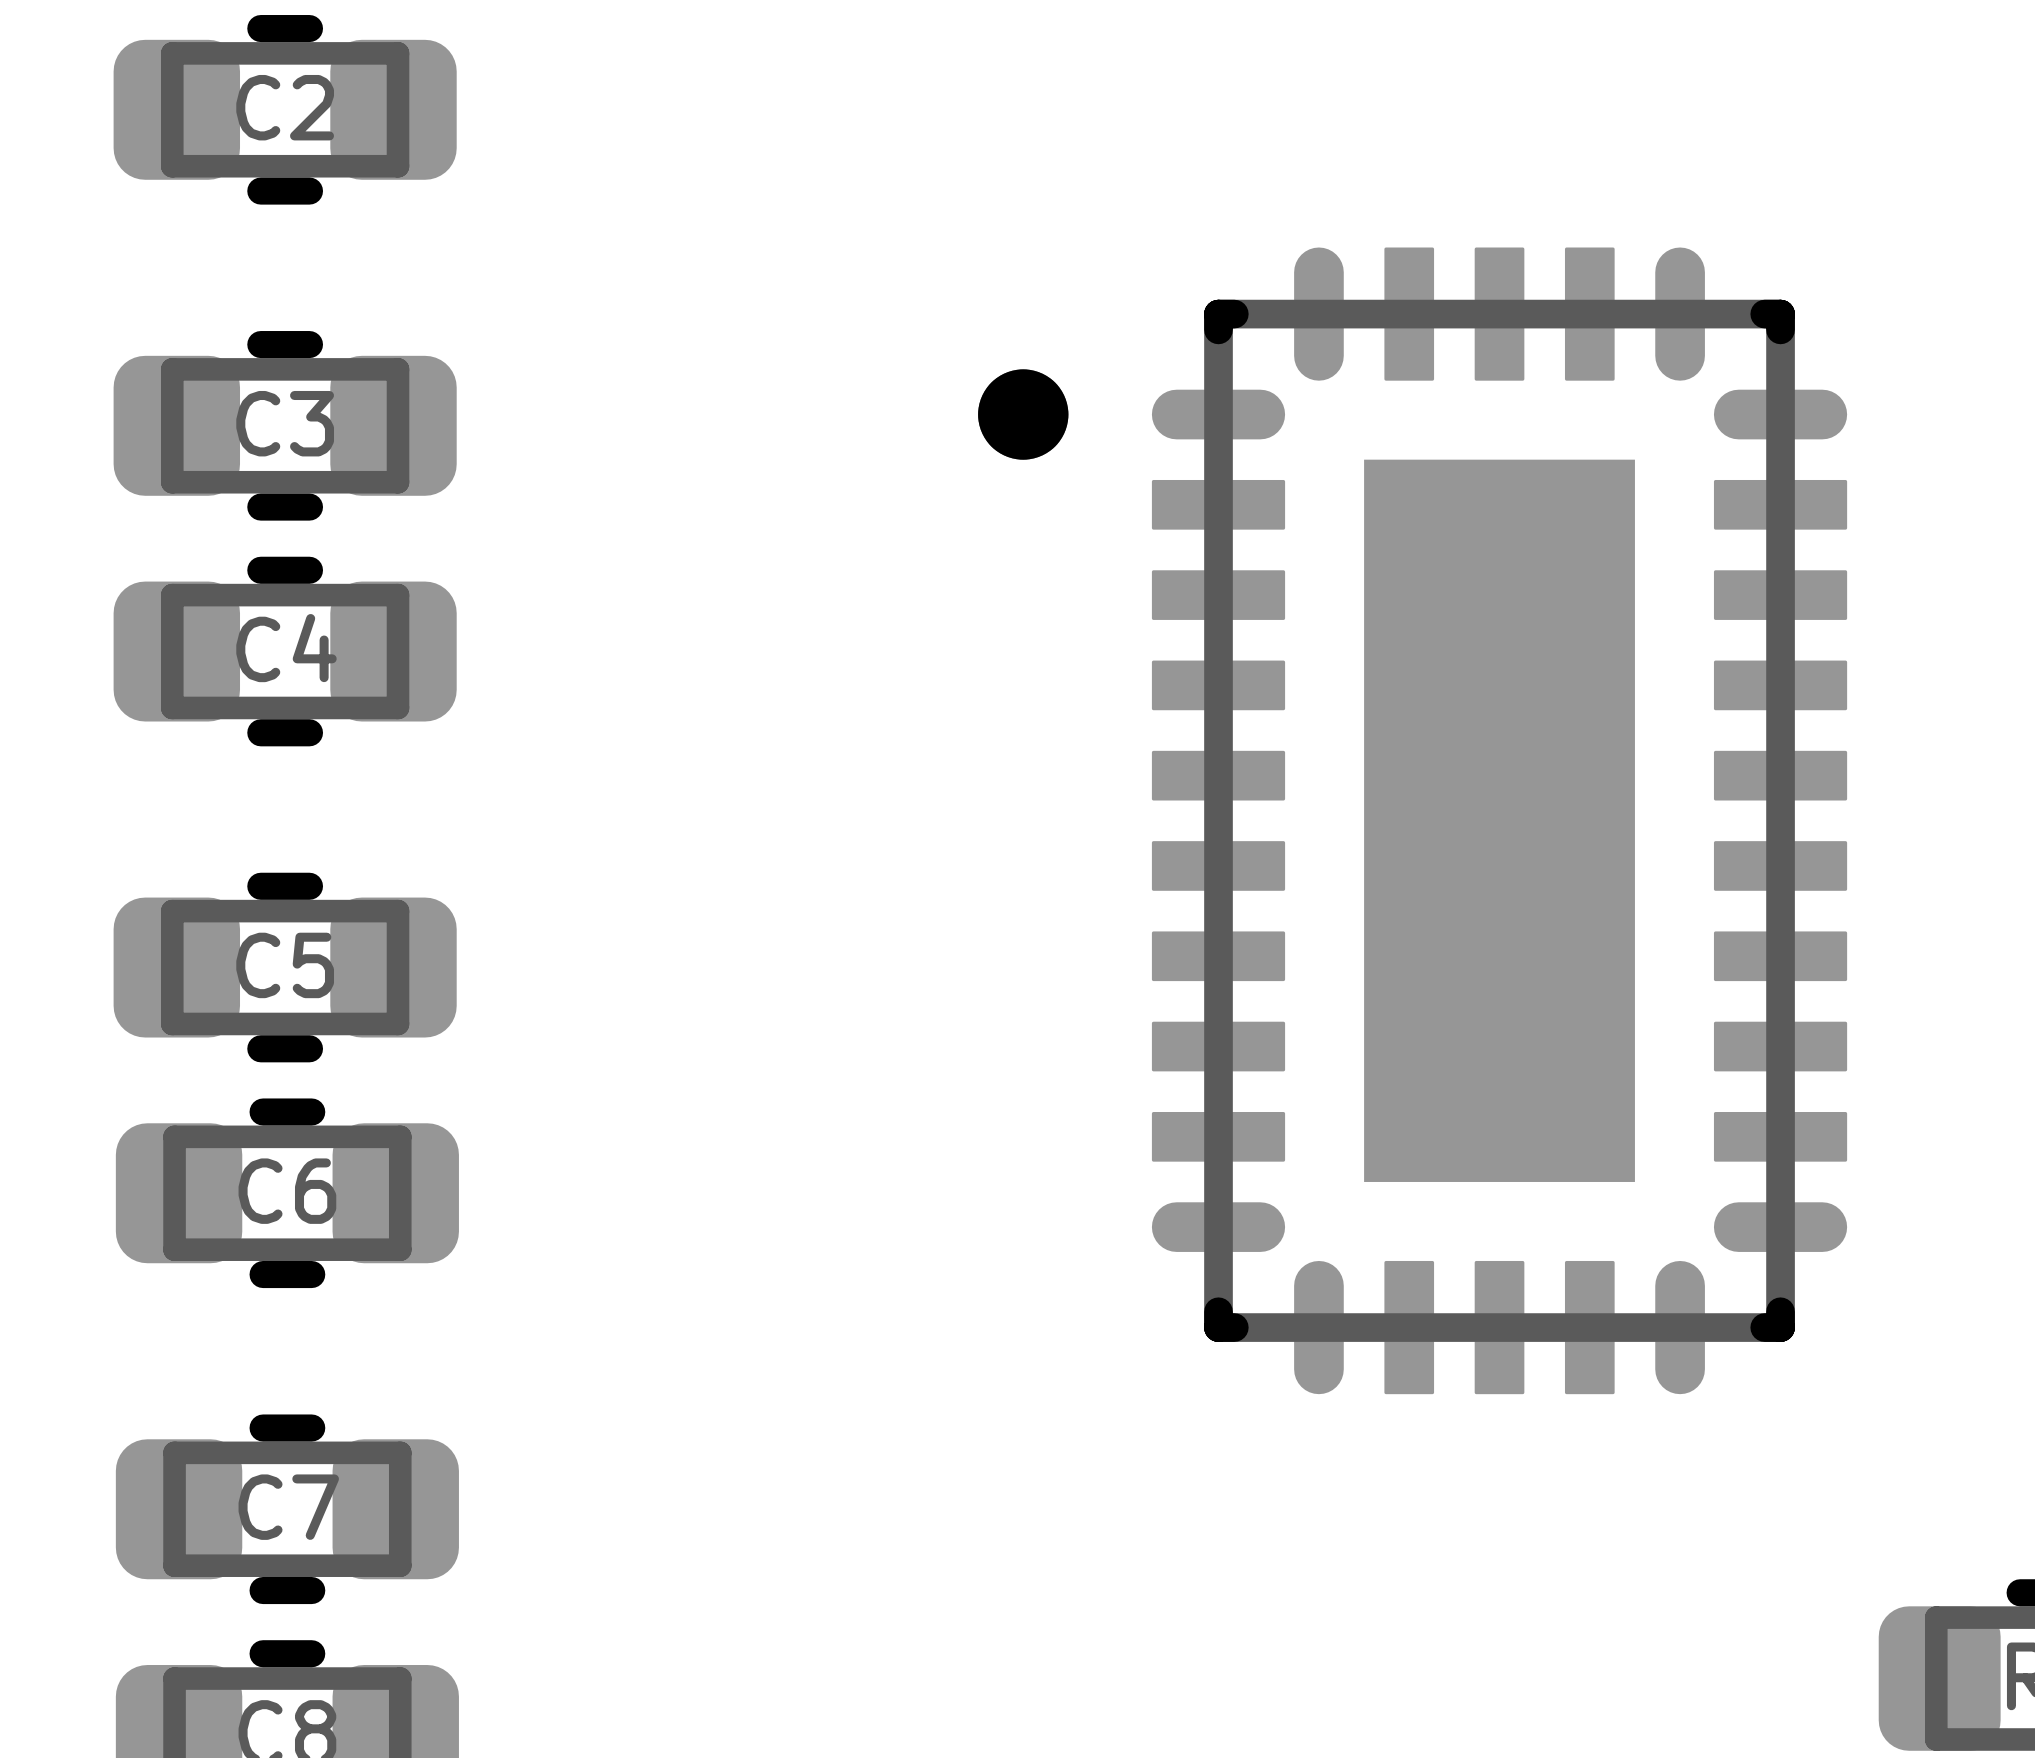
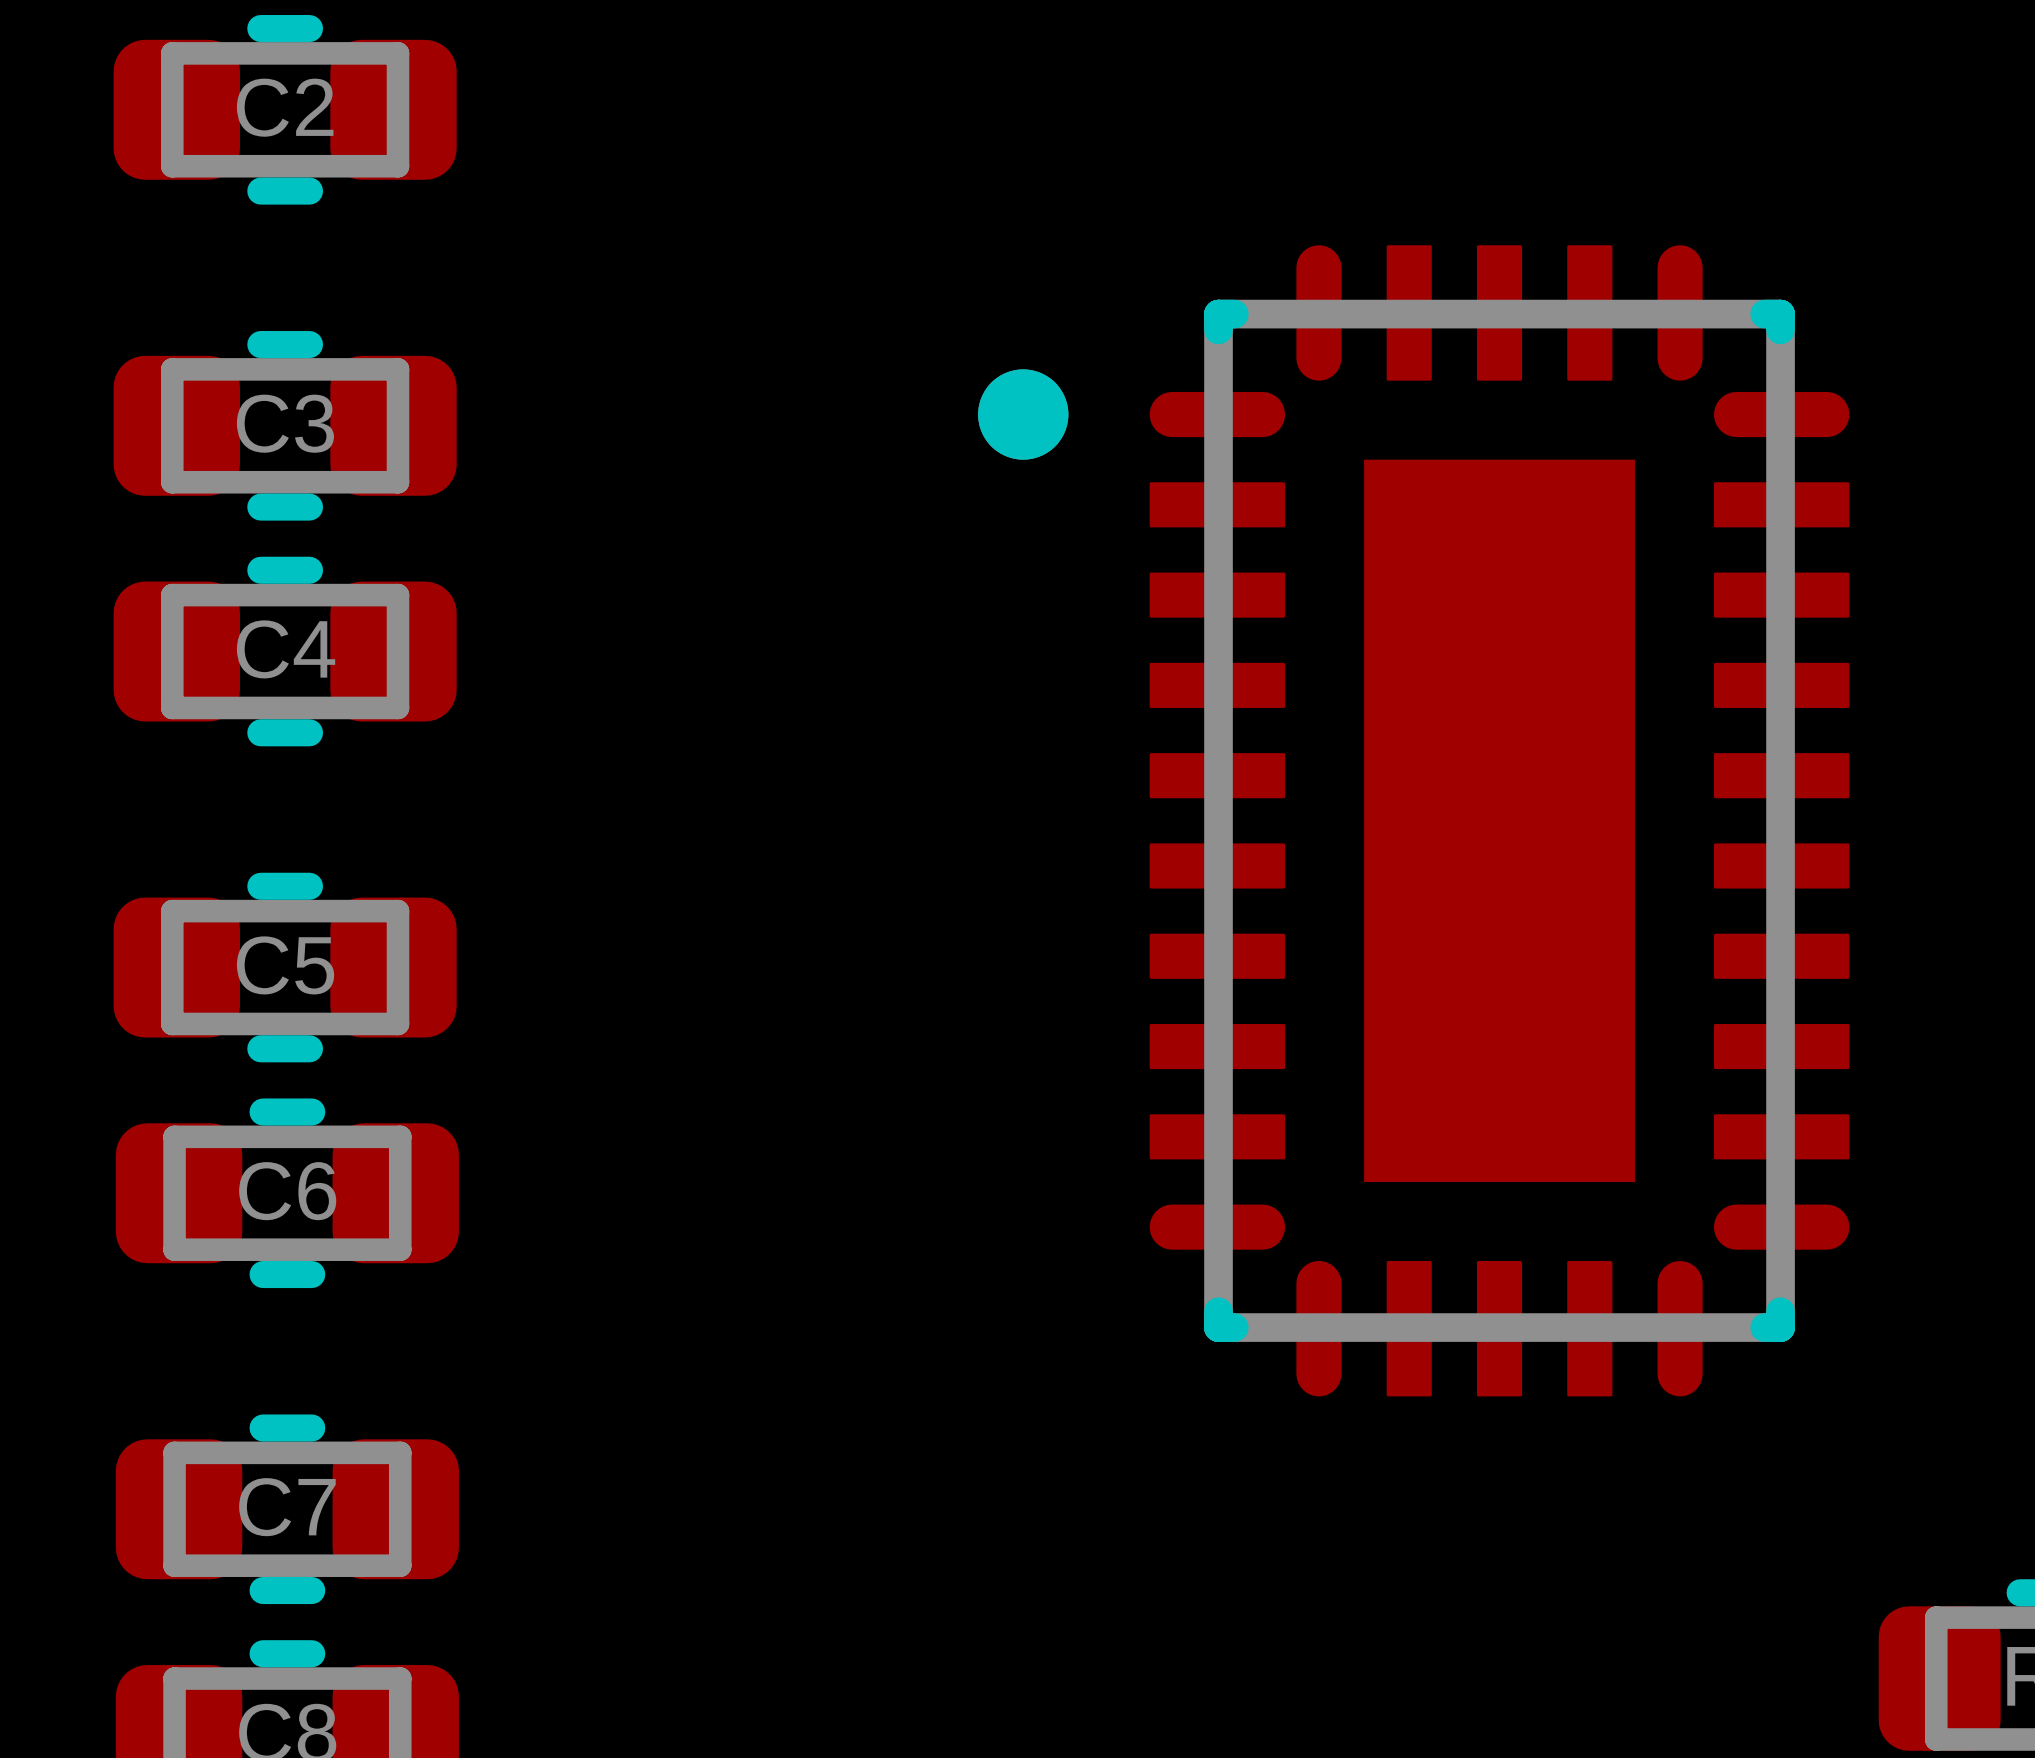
part footprint: [978, 247, 1848, 1395] -> [978, 245, 1850, 1397]

